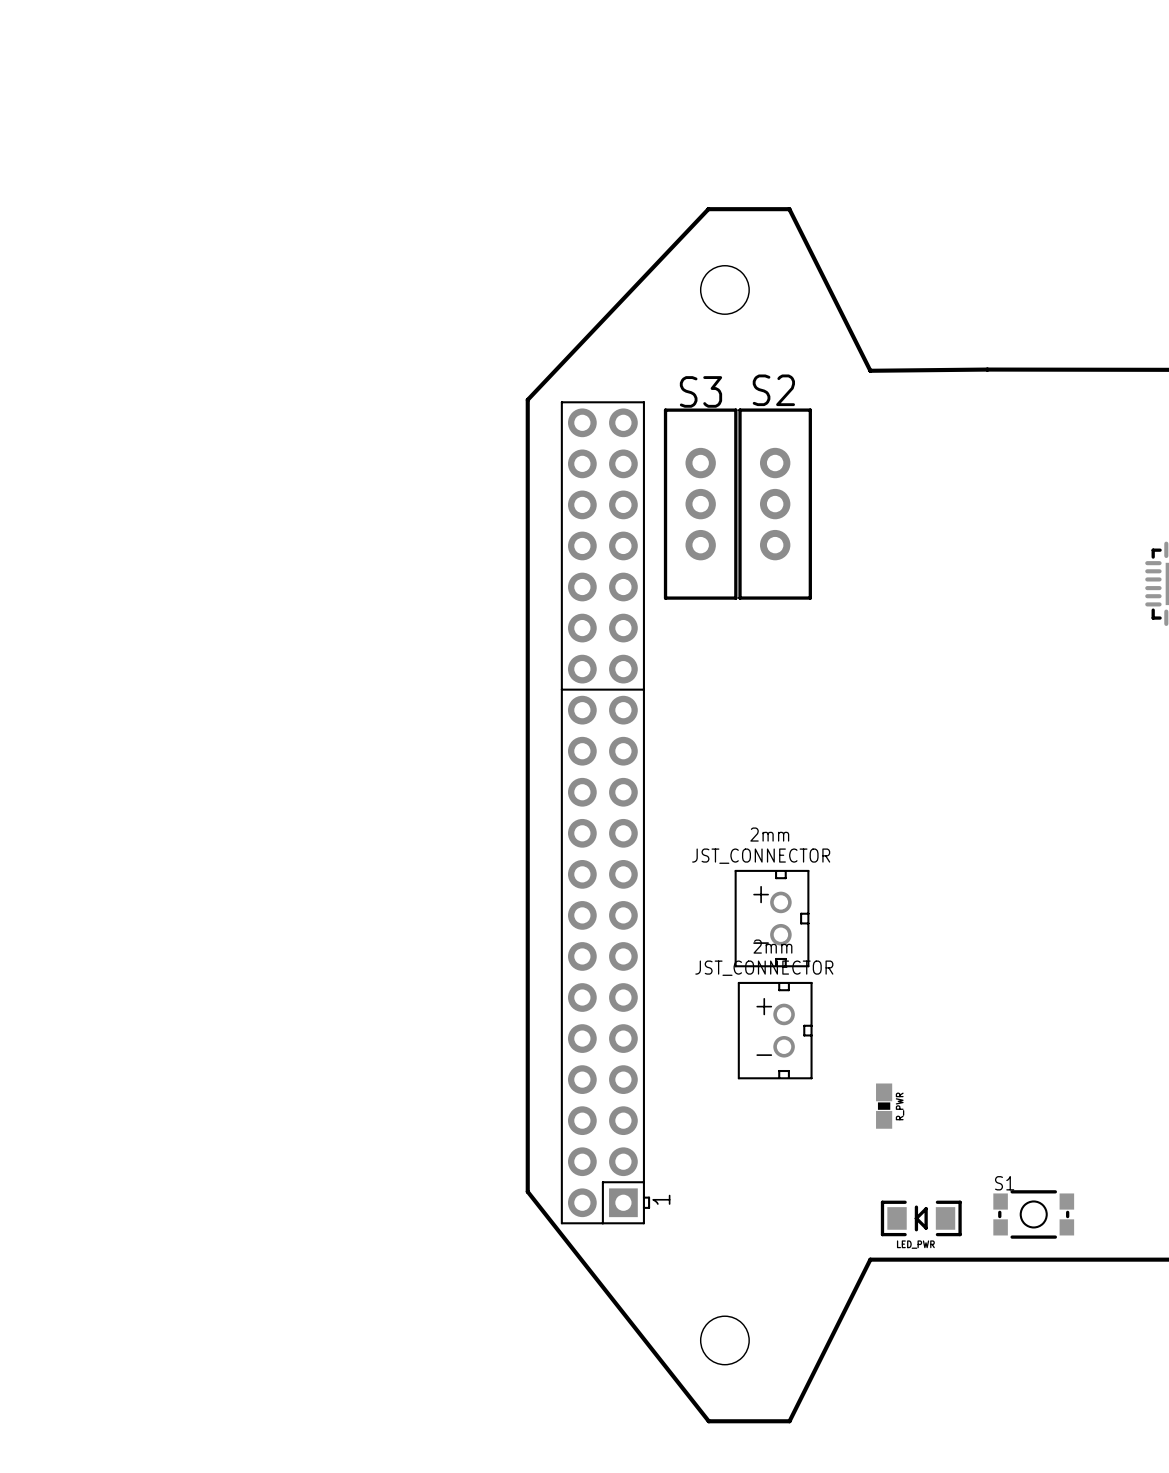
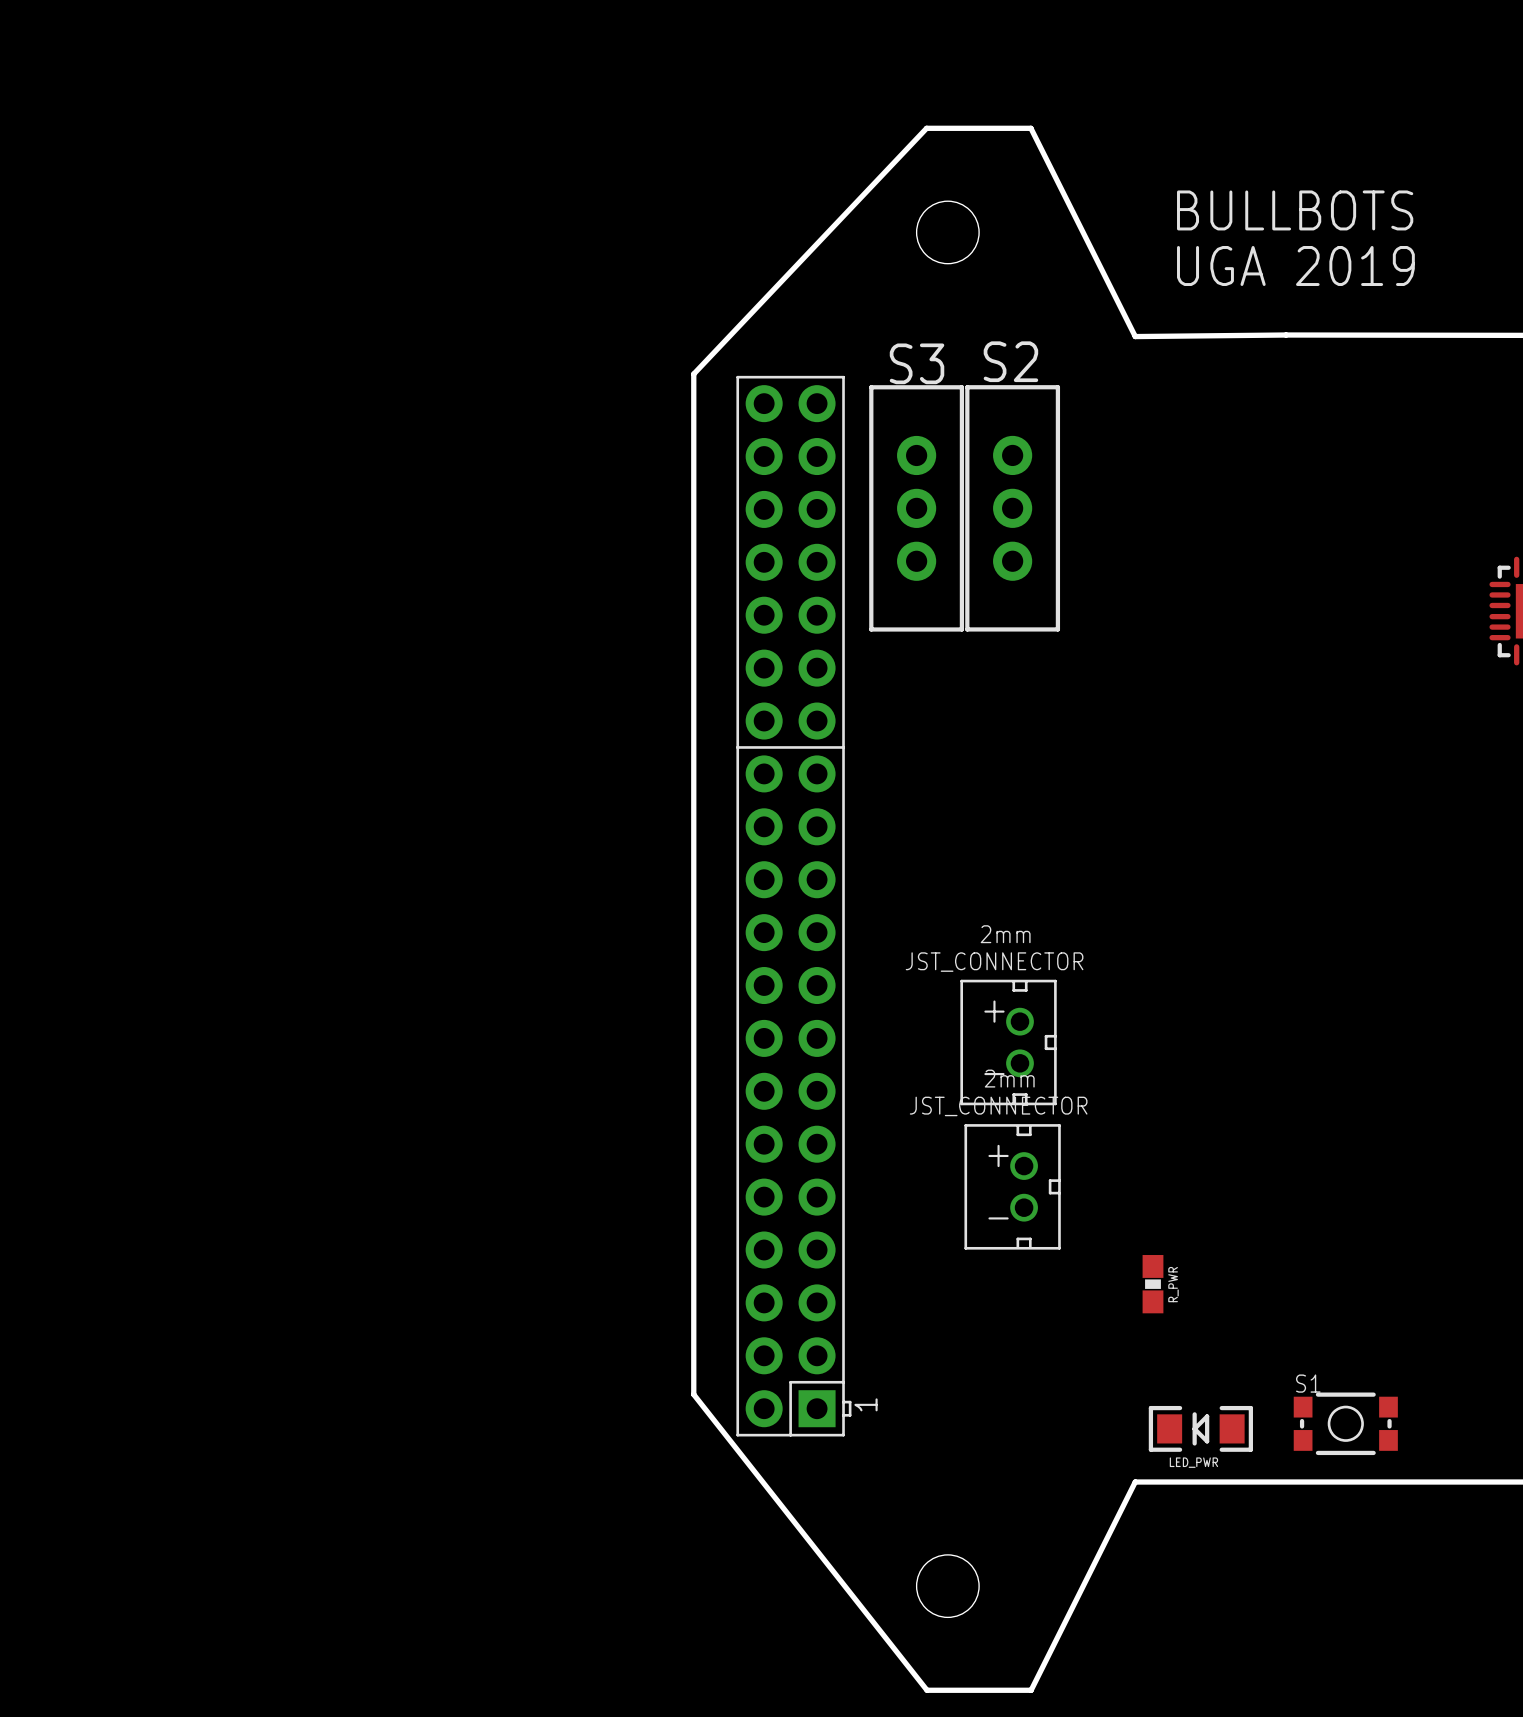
text: none -> BULLBOTS (1295, 210)
text: none -> UGA 2019 (1295, 265)

